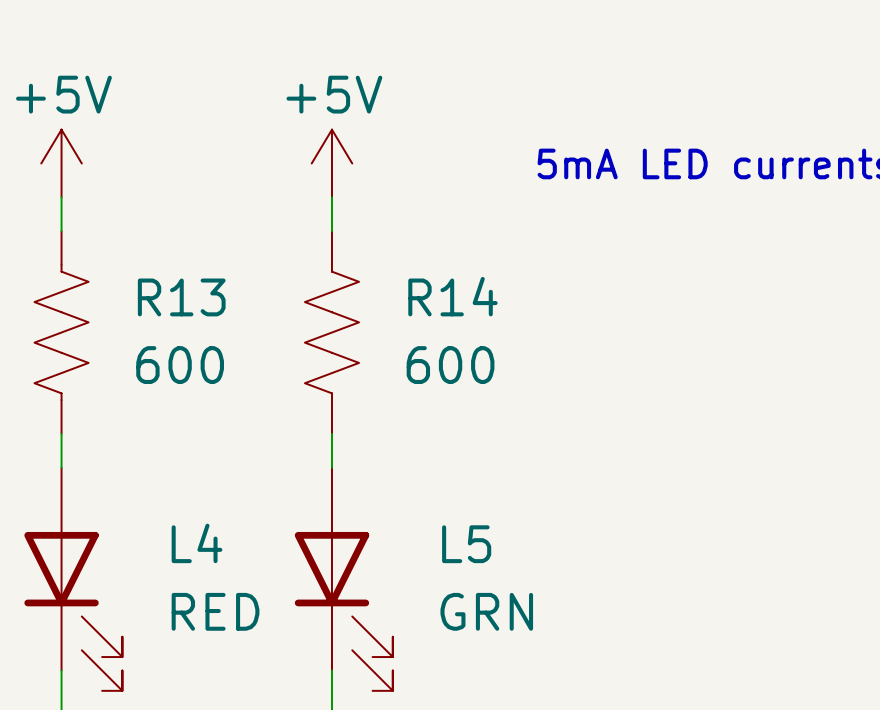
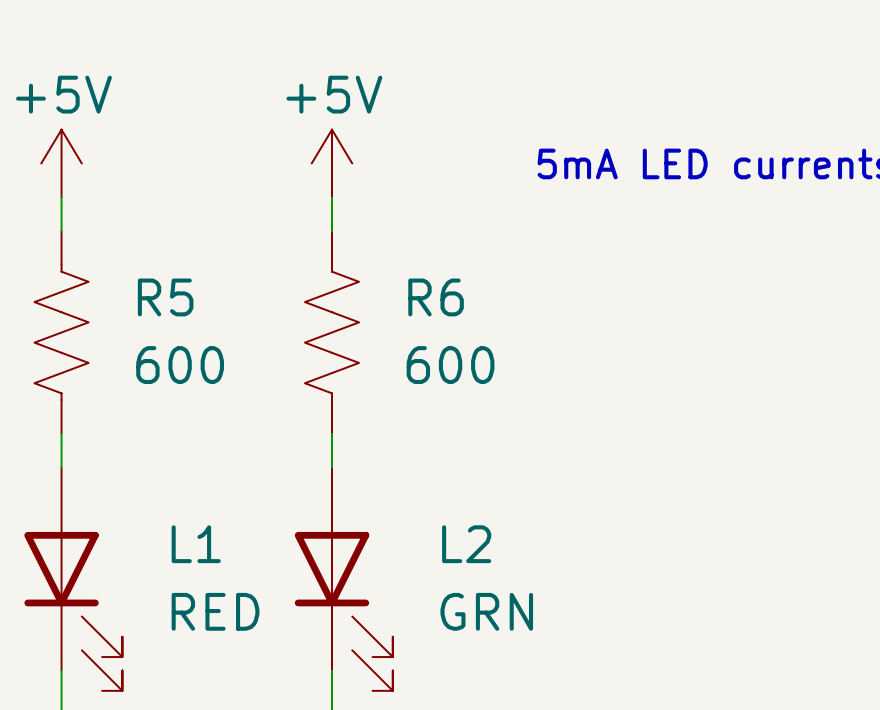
R14 name: R14 (452, 296) -> R6 (436, 297)
R13 name: R13 (181, 297) -> R5 (165, 297)
L4 name: L4 (197, 543) -> L1 (196, 544)
L5 name: L5 (466, 544) -> L2 (466, 544)

